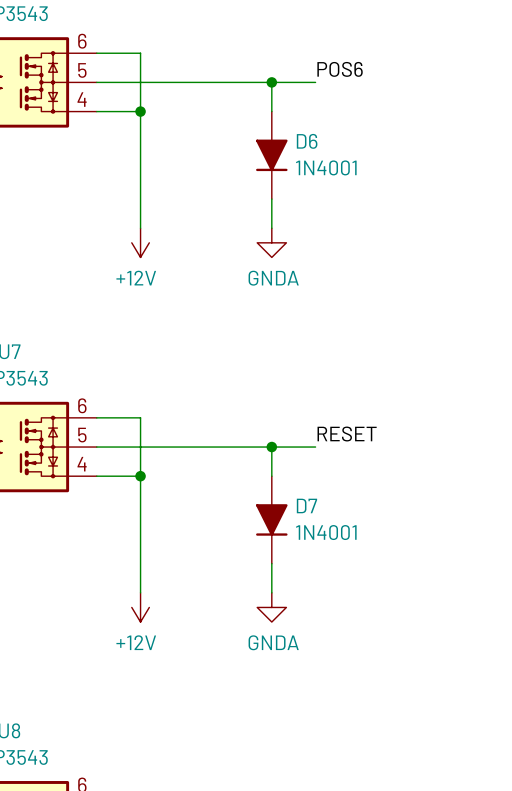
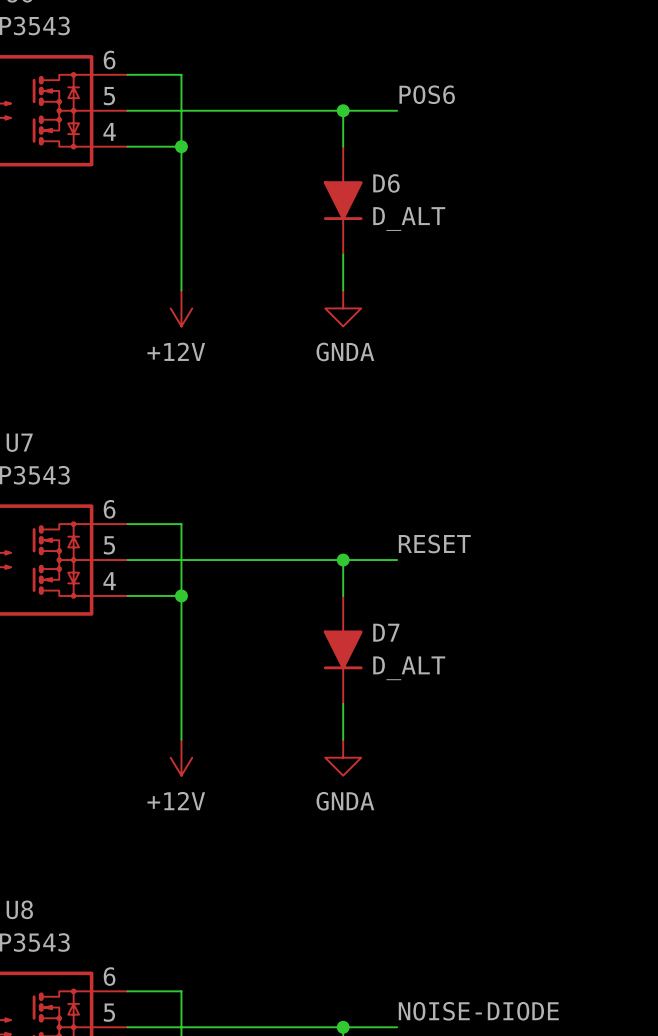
D6 value: 1N4001 (326, 167) -> D_ALT (409, 219)
D7 value: 1N4001 (326, 532) -> D_ALT (409, 668)

